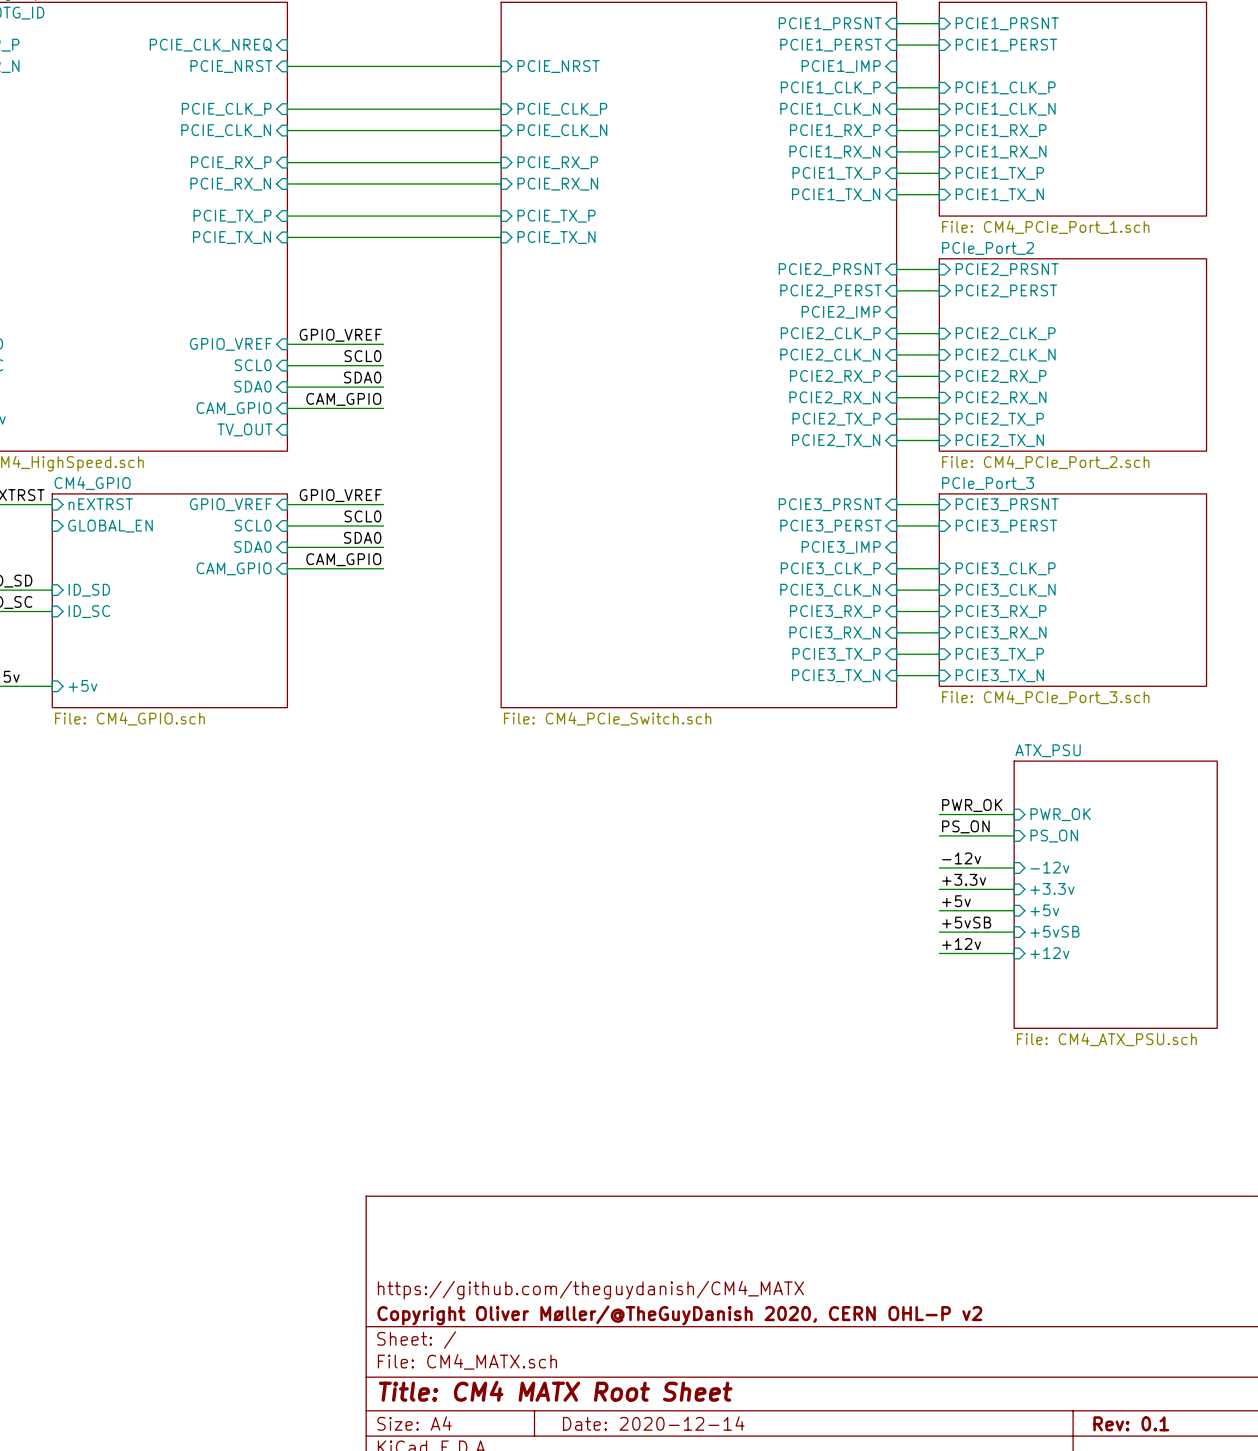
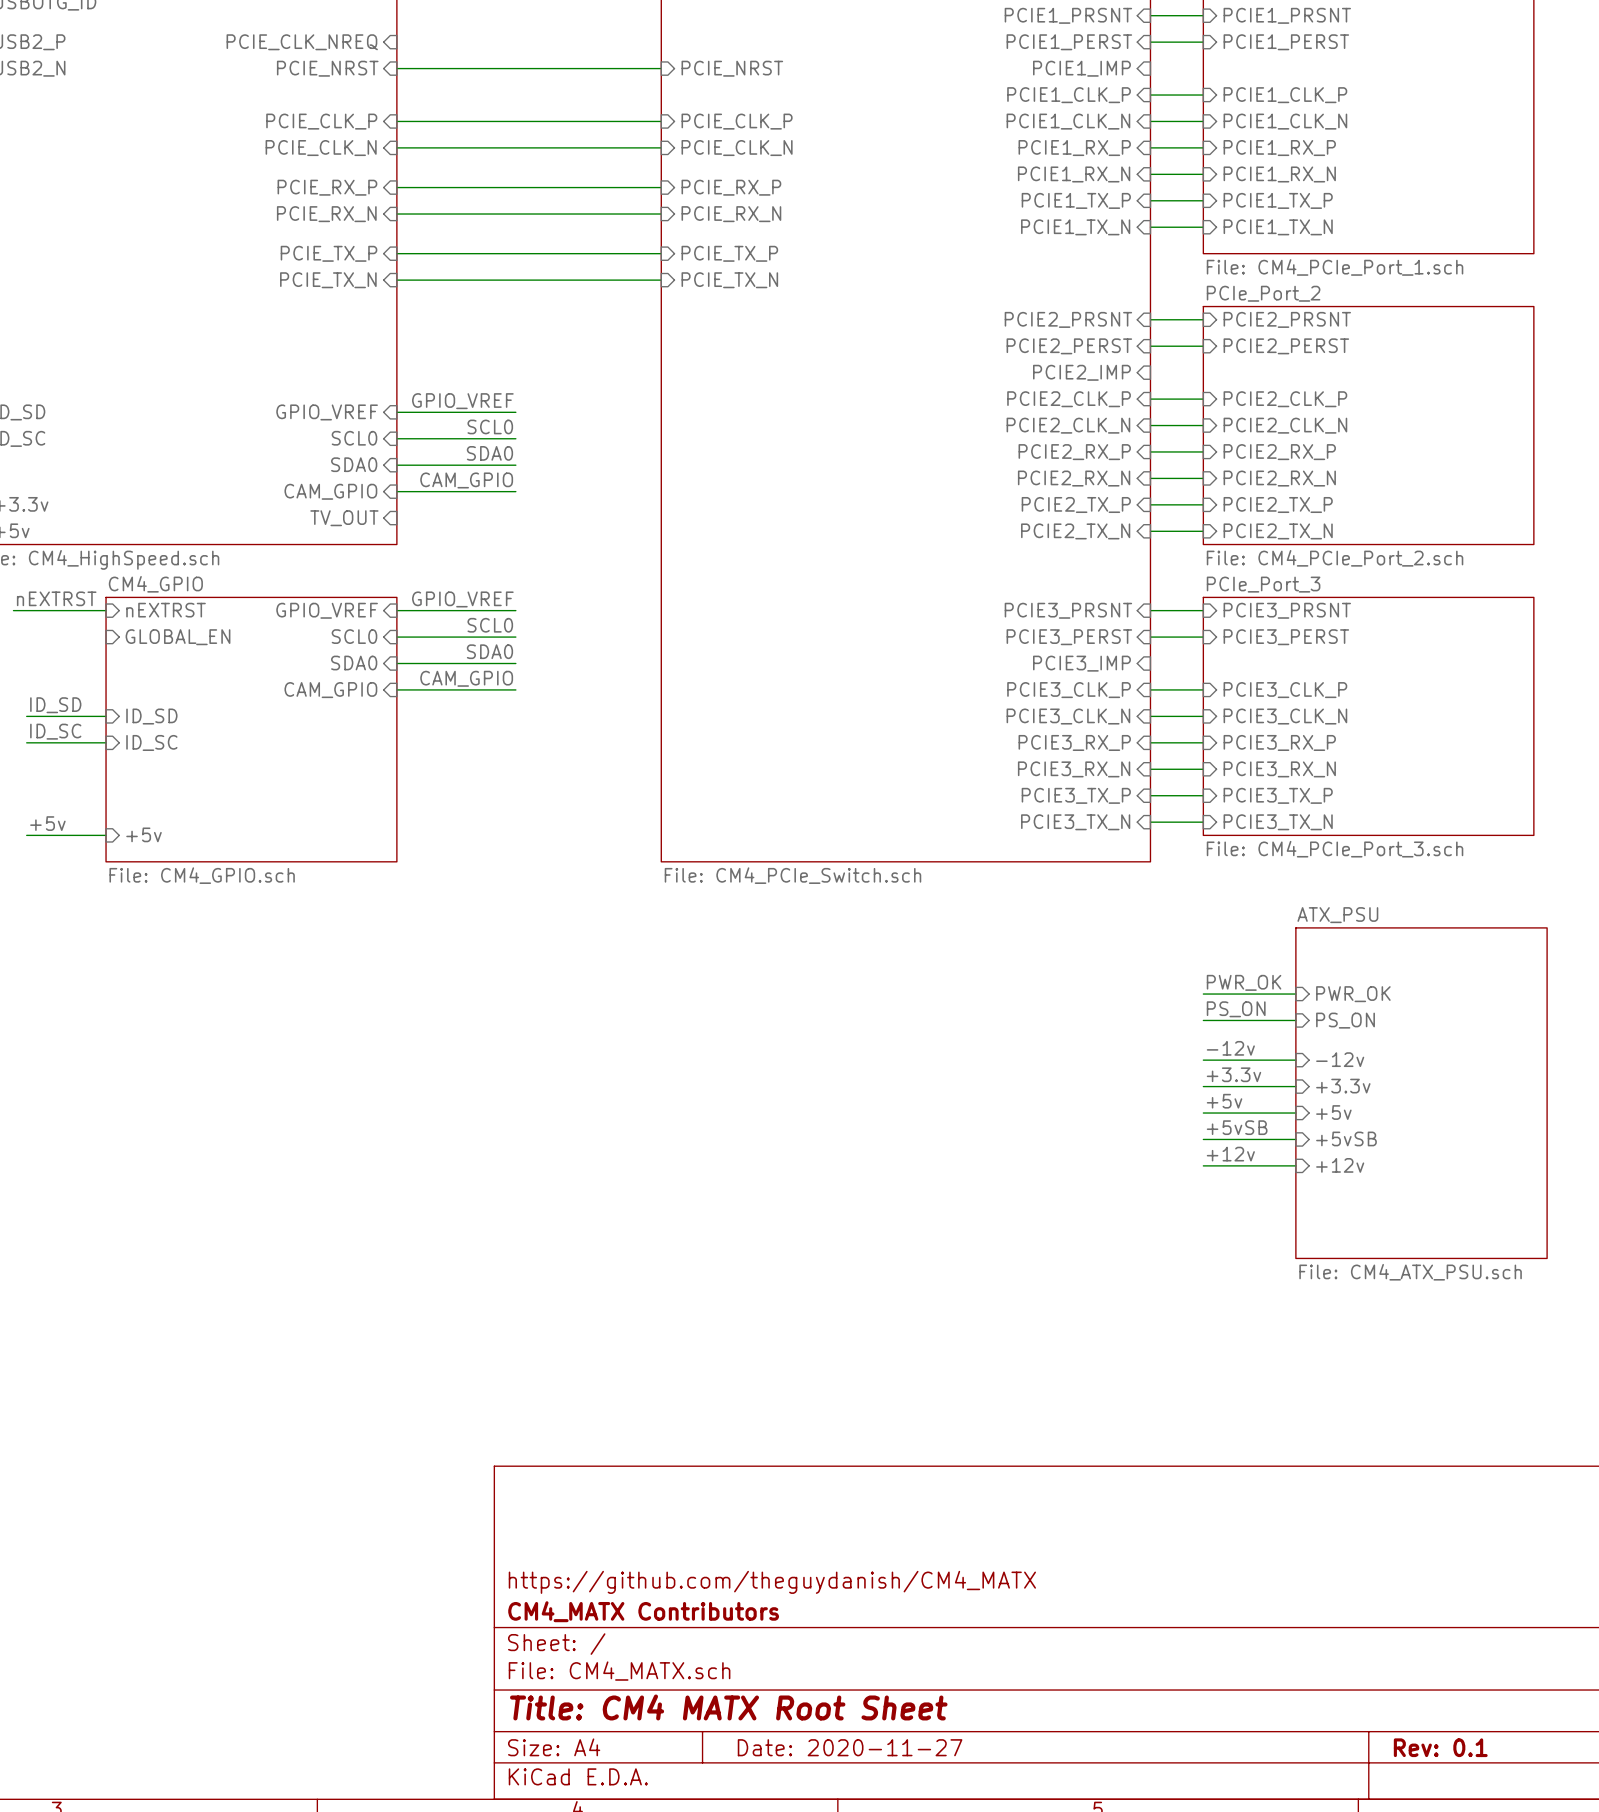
title block: Copyright Oliver Møller/@TheGuyDanish 2020, CERN OHL-P v2 (679, 1315) -> CM4_MATX Contributors (643, 1611)
title block: Date: 2020-12-14 (653, 1423) -> Date: 2020-11-27 (850, 1747)

